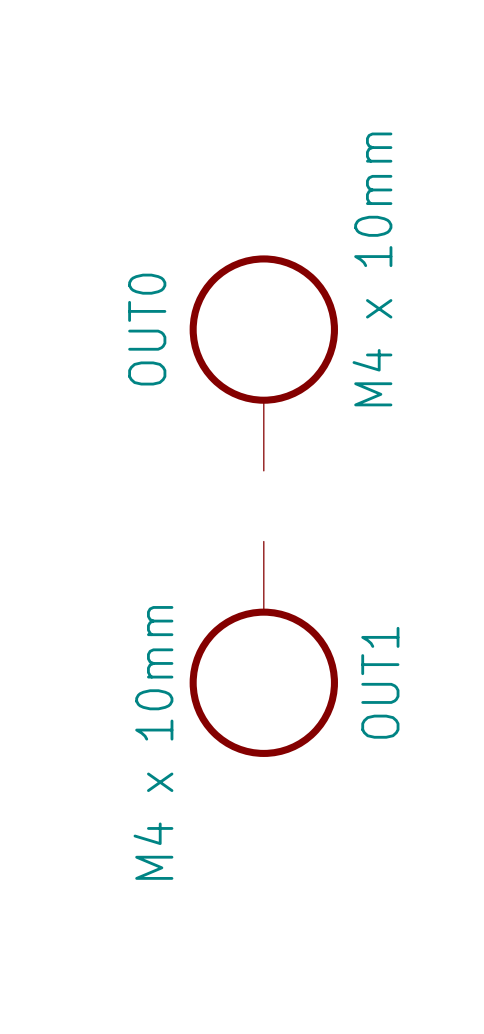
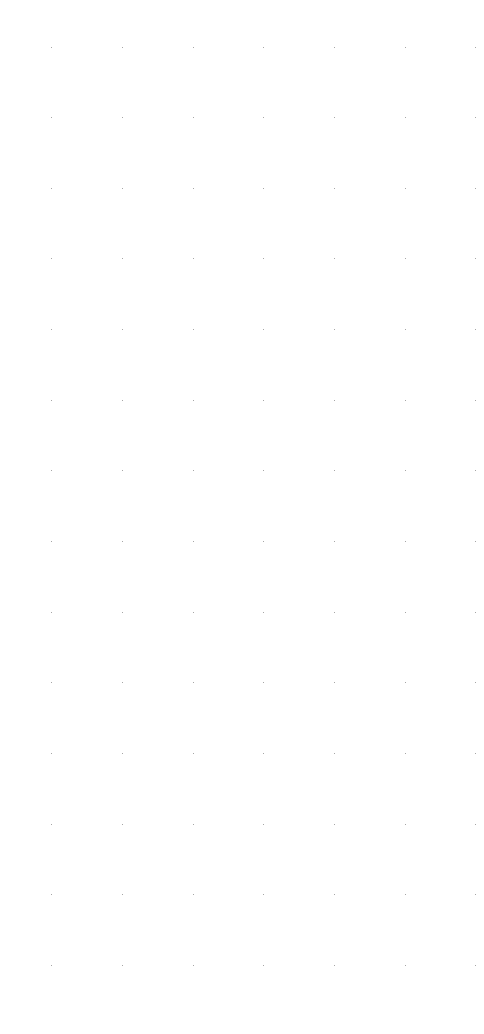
OUT0: M4 x 10mm (263, 363) -> none
OUT1: M4 x 10mm (263, 649) -> none

